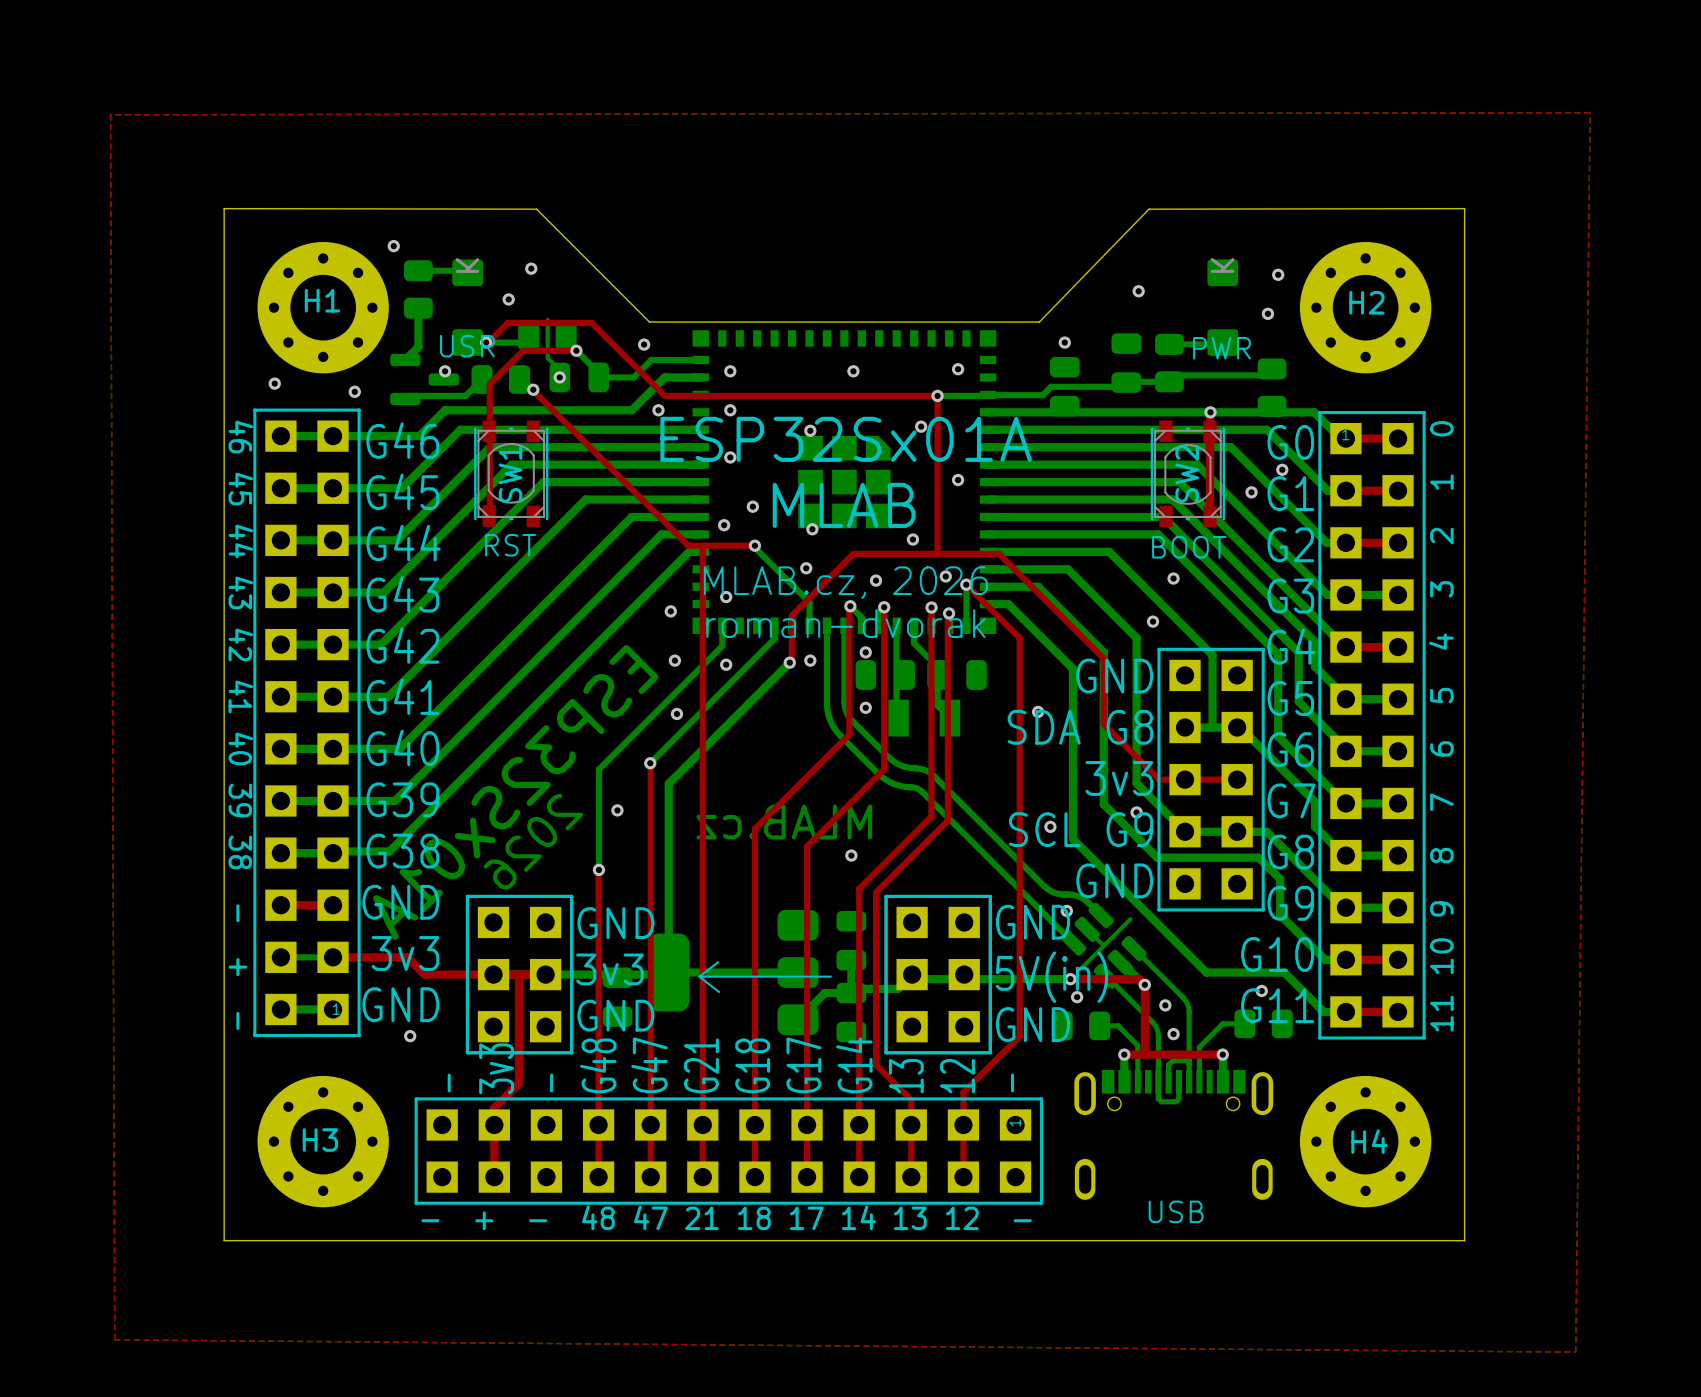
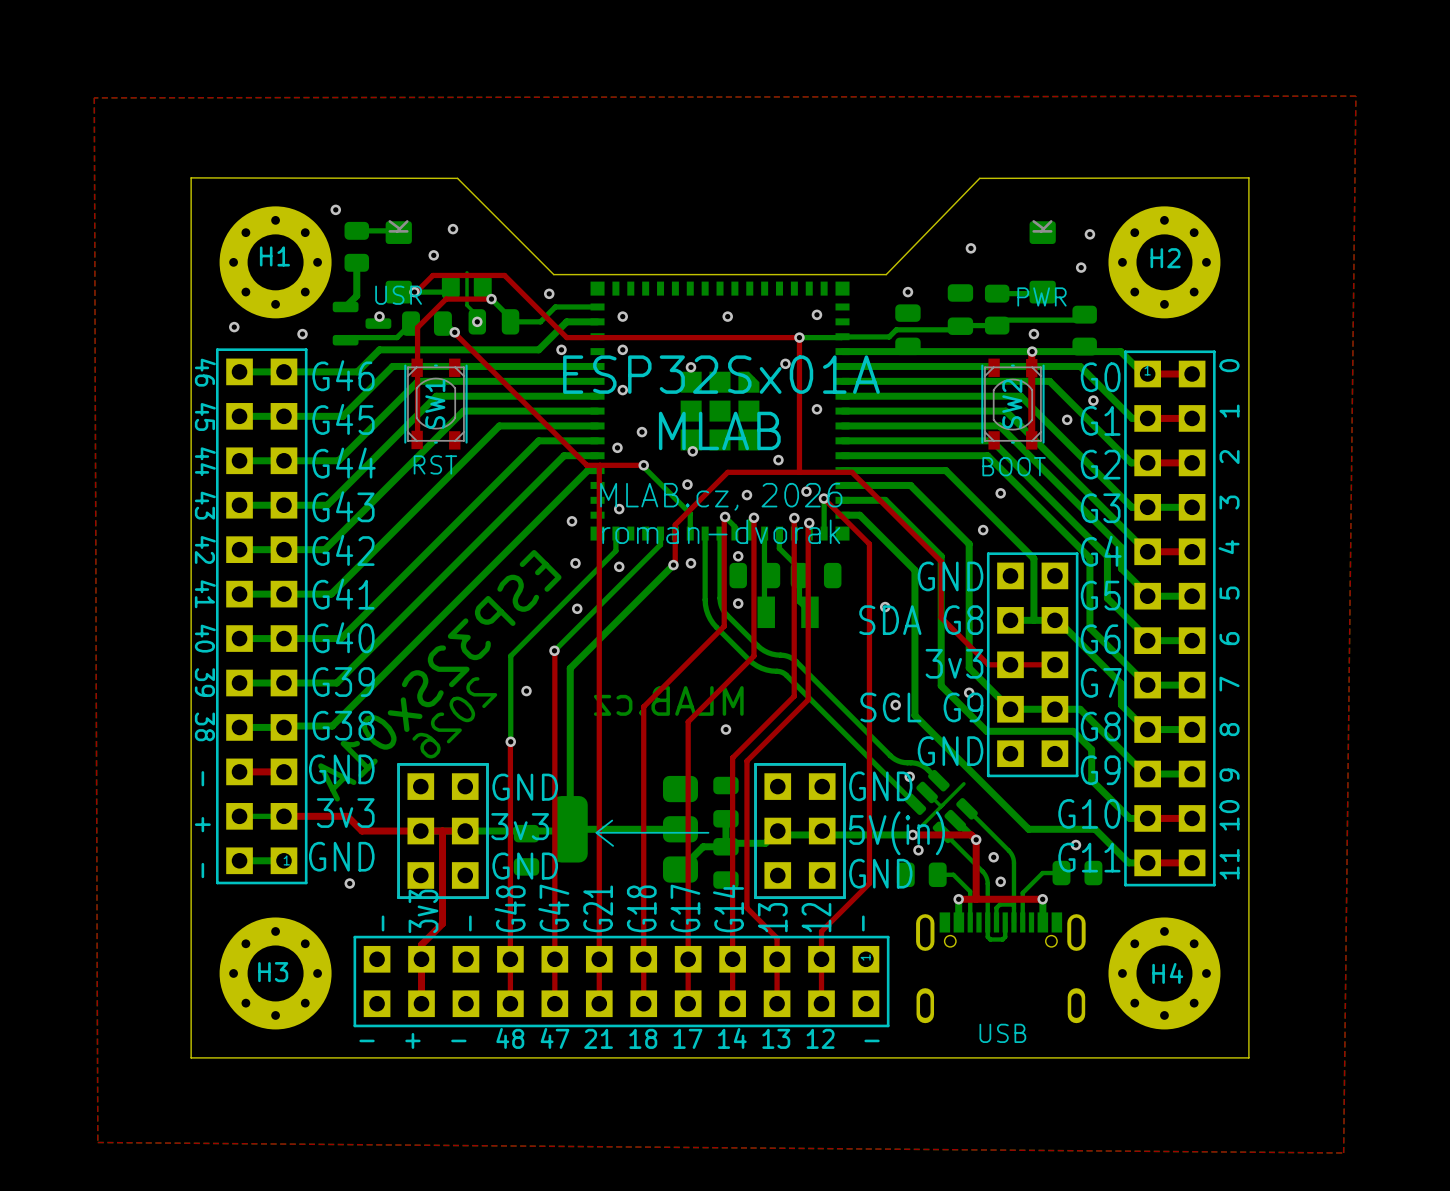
via: none -> (1033, 334)

